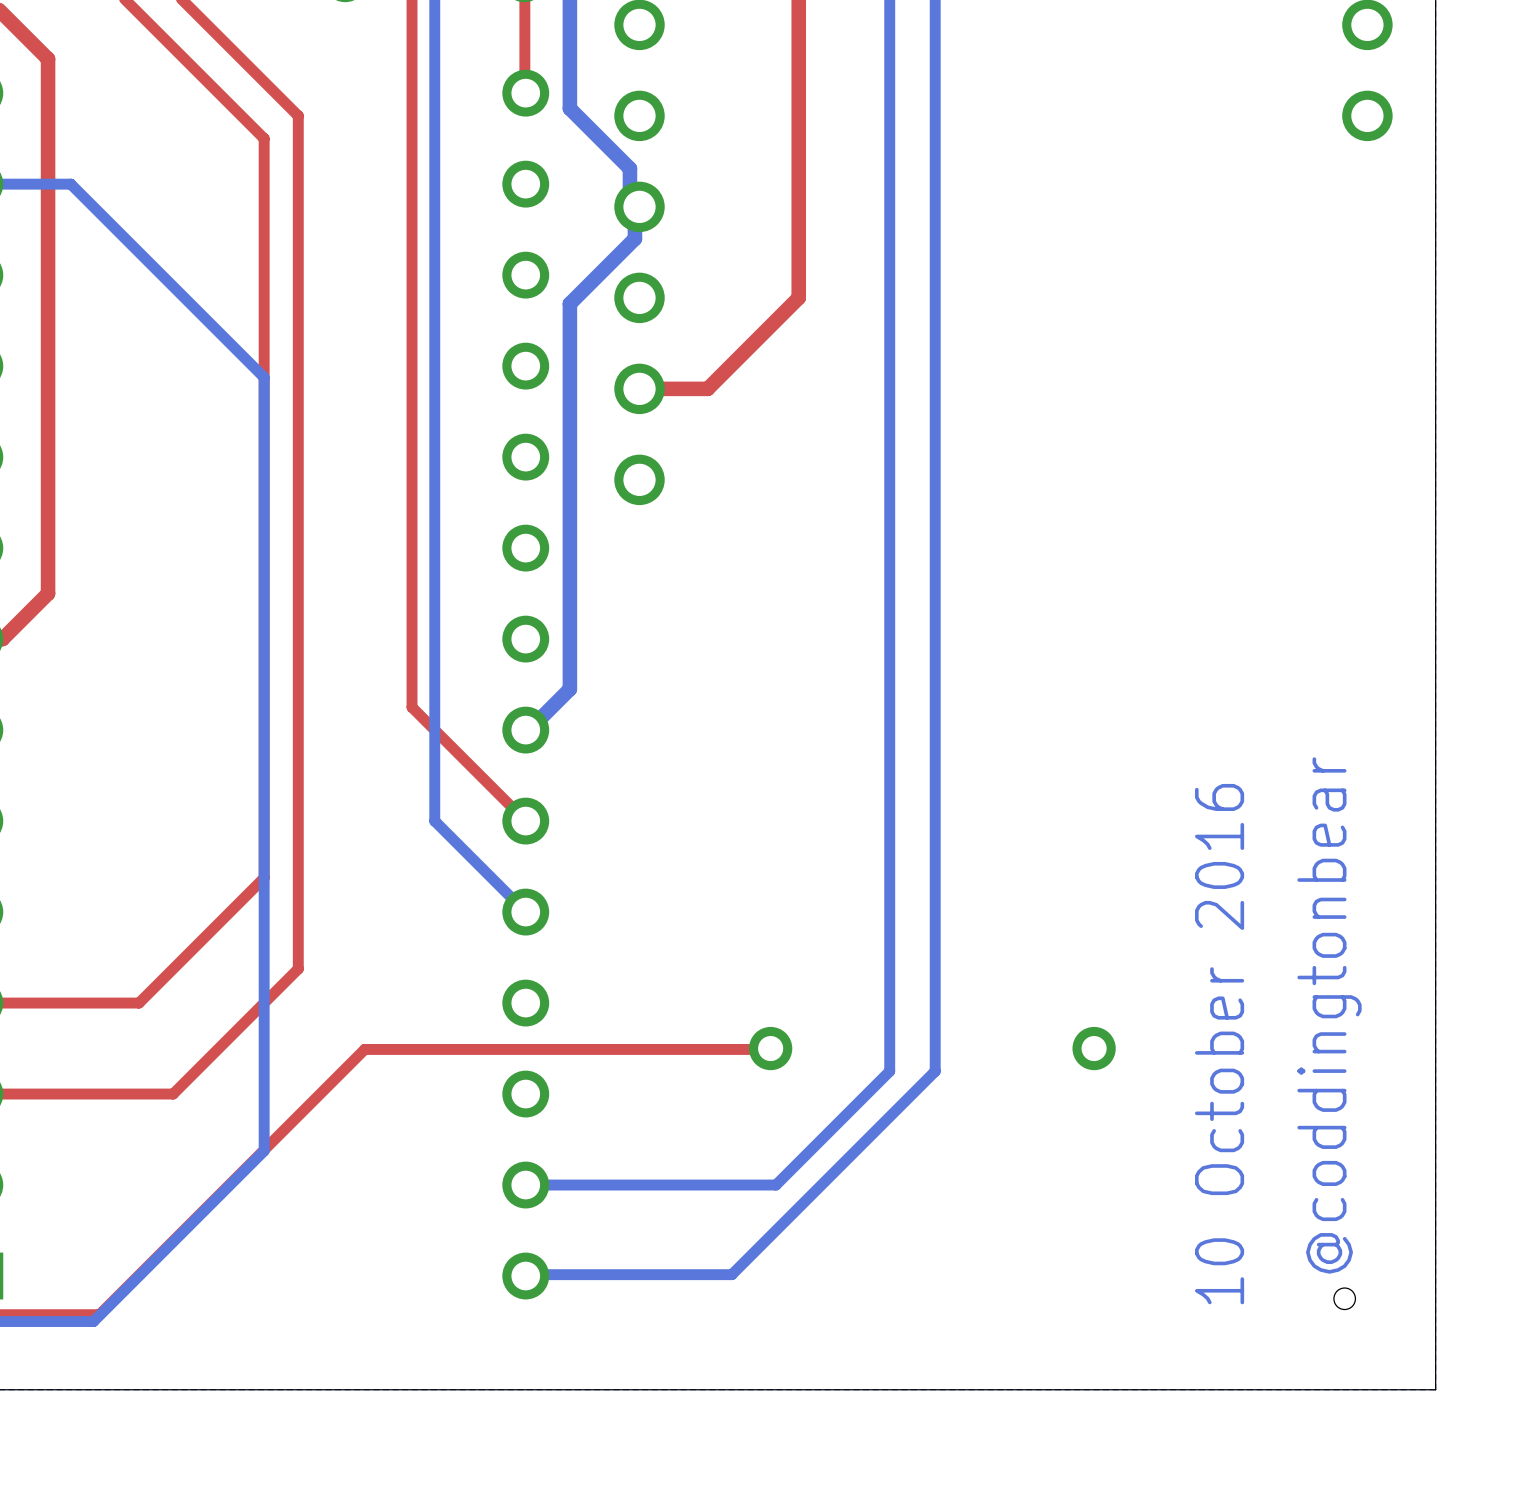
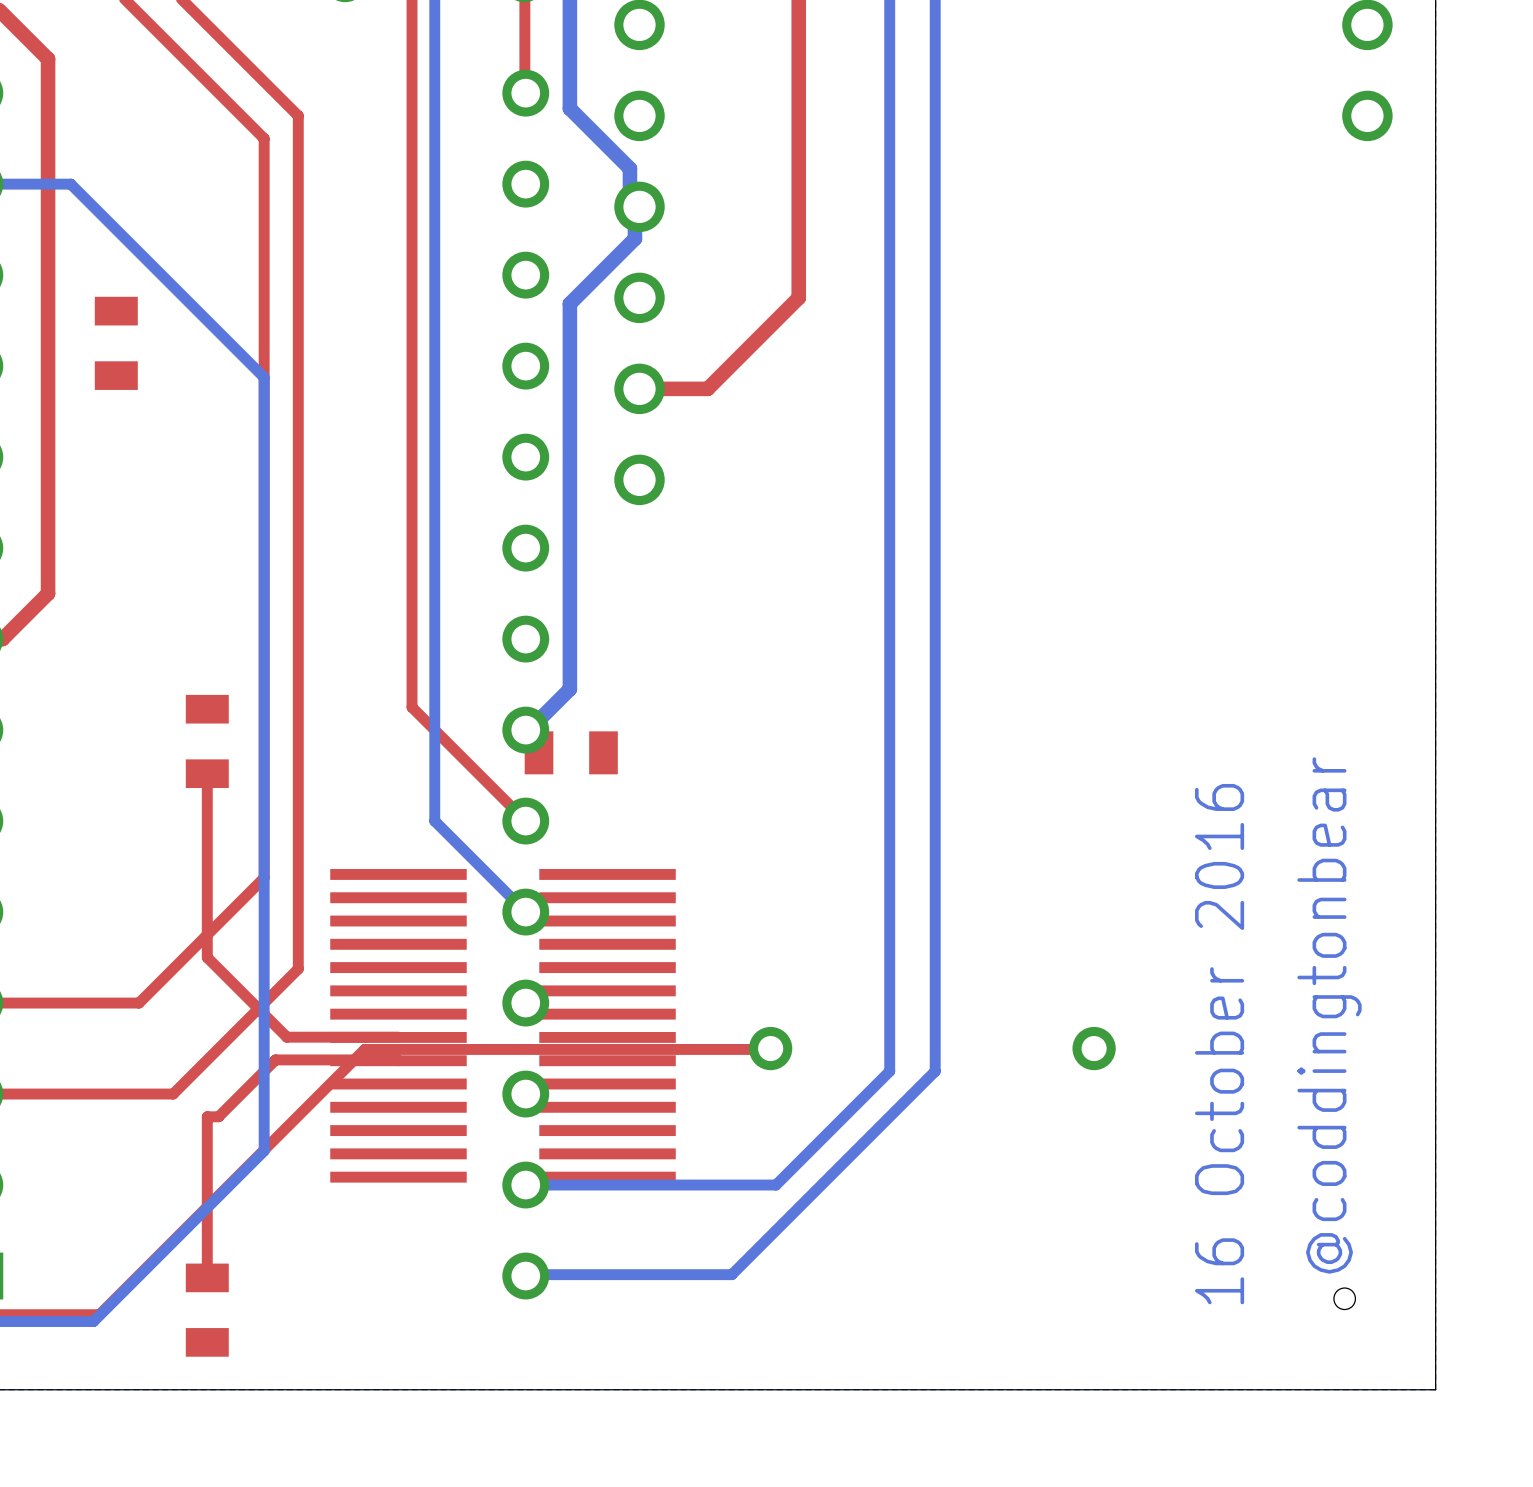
part: none -> (116, 343)
part: none -> (207, 741)
part: none -> (571, 752)
top track: none -> (207, 773) (207, 957) (286, 1037) (398, 1037)
part: none -> (503, 1025)
text: 10 October 2016 (1219, 1044) -> 16 October 2016 (1219, 1044)
top track: none -> (398, 1060) (275, 1059) (218, 1116) (207, 1116) (207, 1277)
part: none -> (207, 1310)

